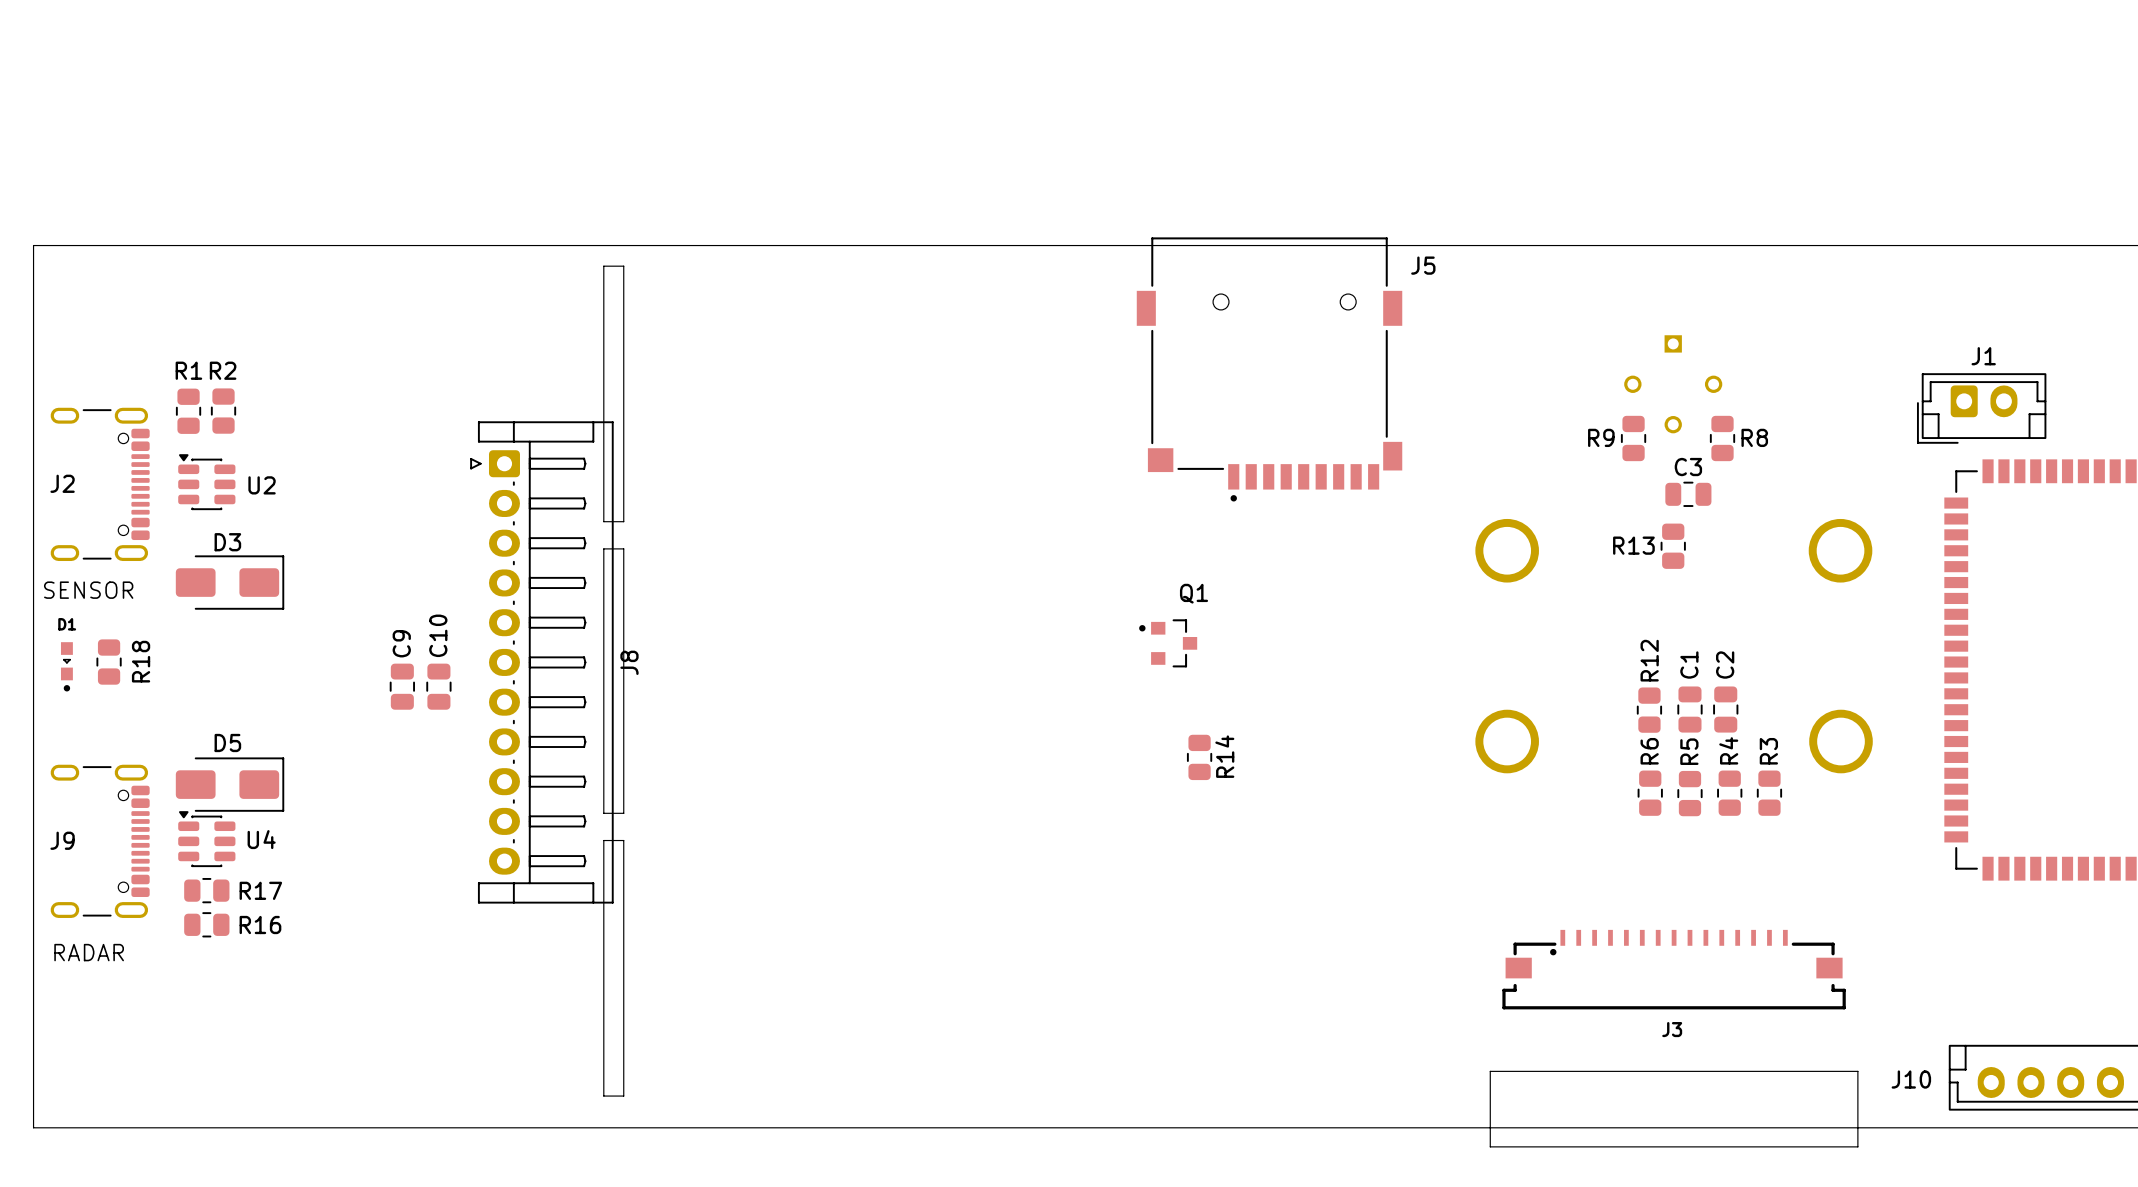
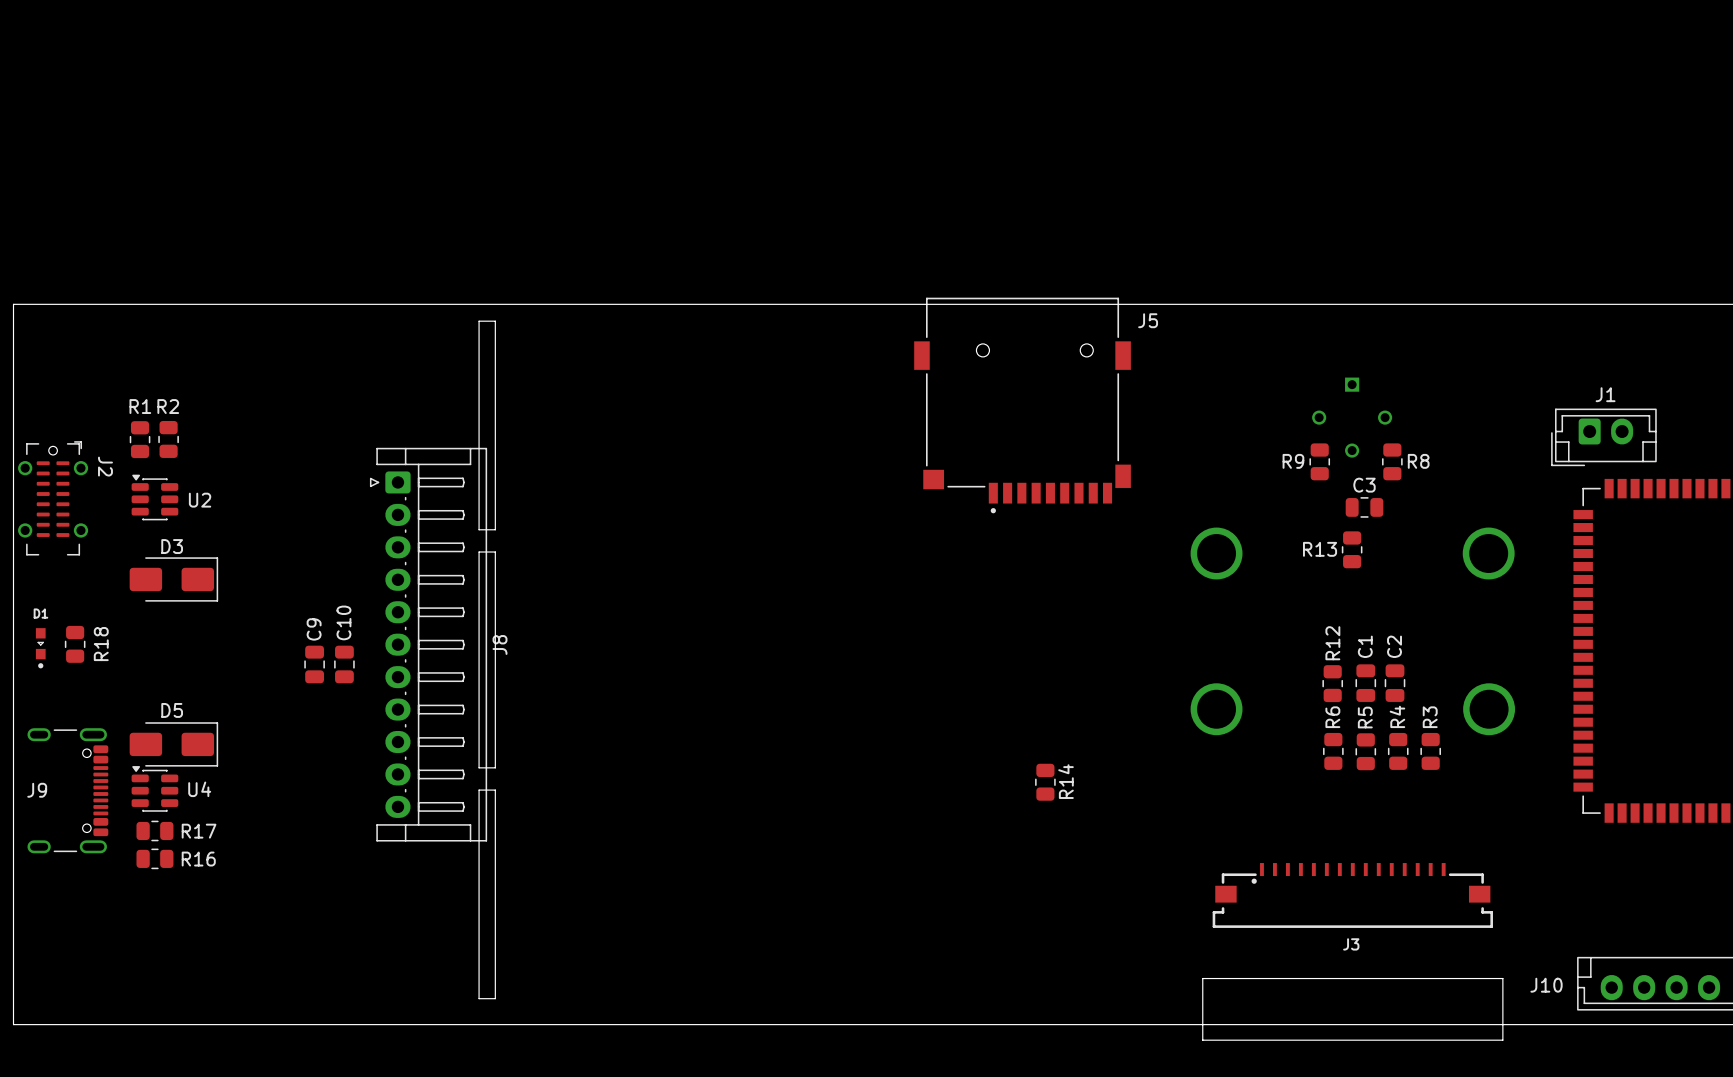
J2 footprint: [50, 407, 150, 562] -> [18, 441, 89, 556]
J2 name position: J2 (62, 483) -> J2 (105, 466)
text: SENSOR (88, 590) -> none
Q1: (1168, 643) -> none
R14 position: (1199, 757) -> (1045, 782)
text: RADAR (89, 952) -> none

